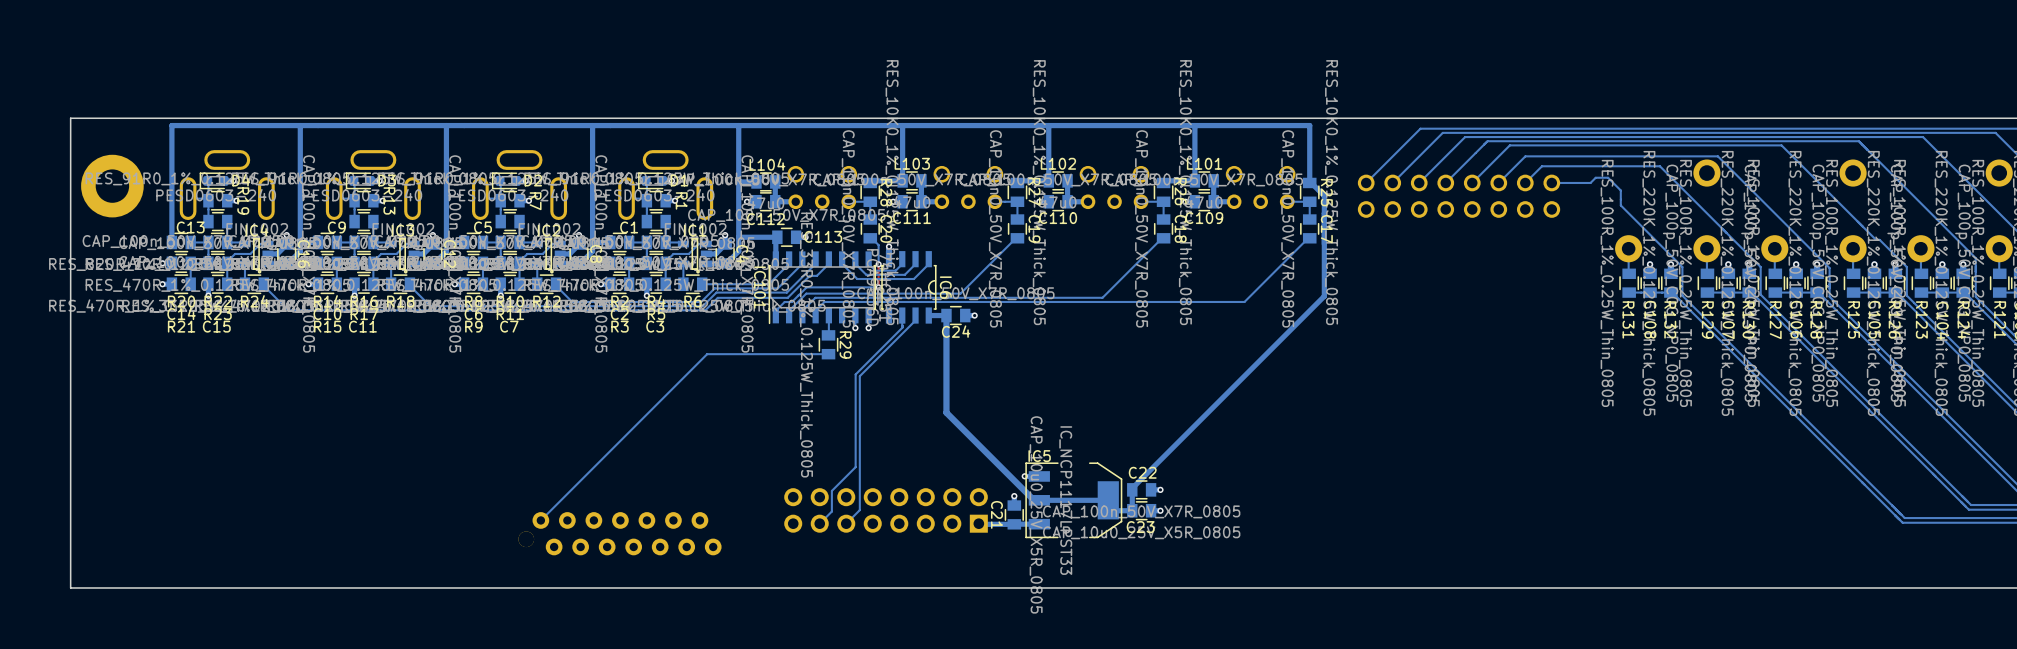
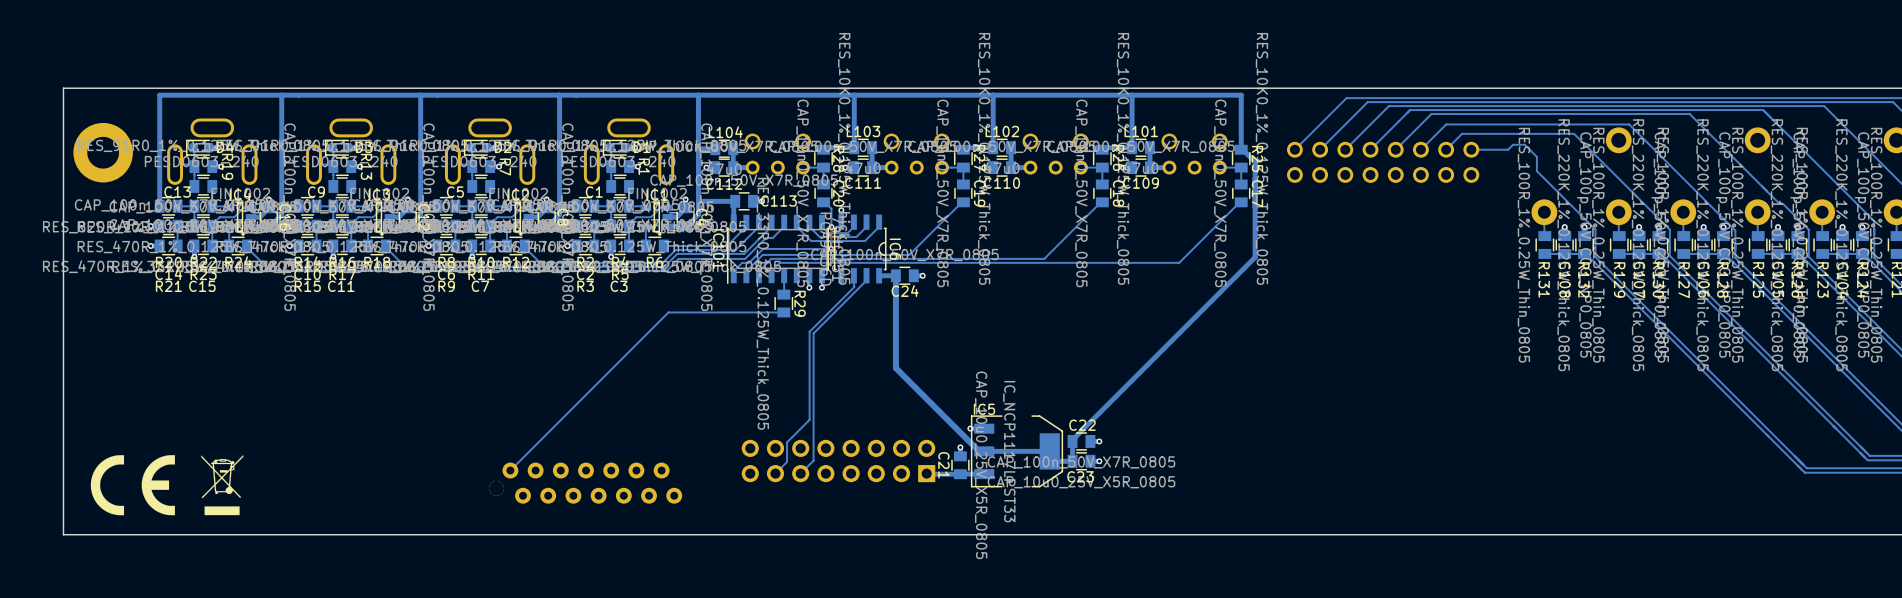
drawing: none -> [90, 455, 175, 516]
drawing: none -> [201, 455, 244, 516]

